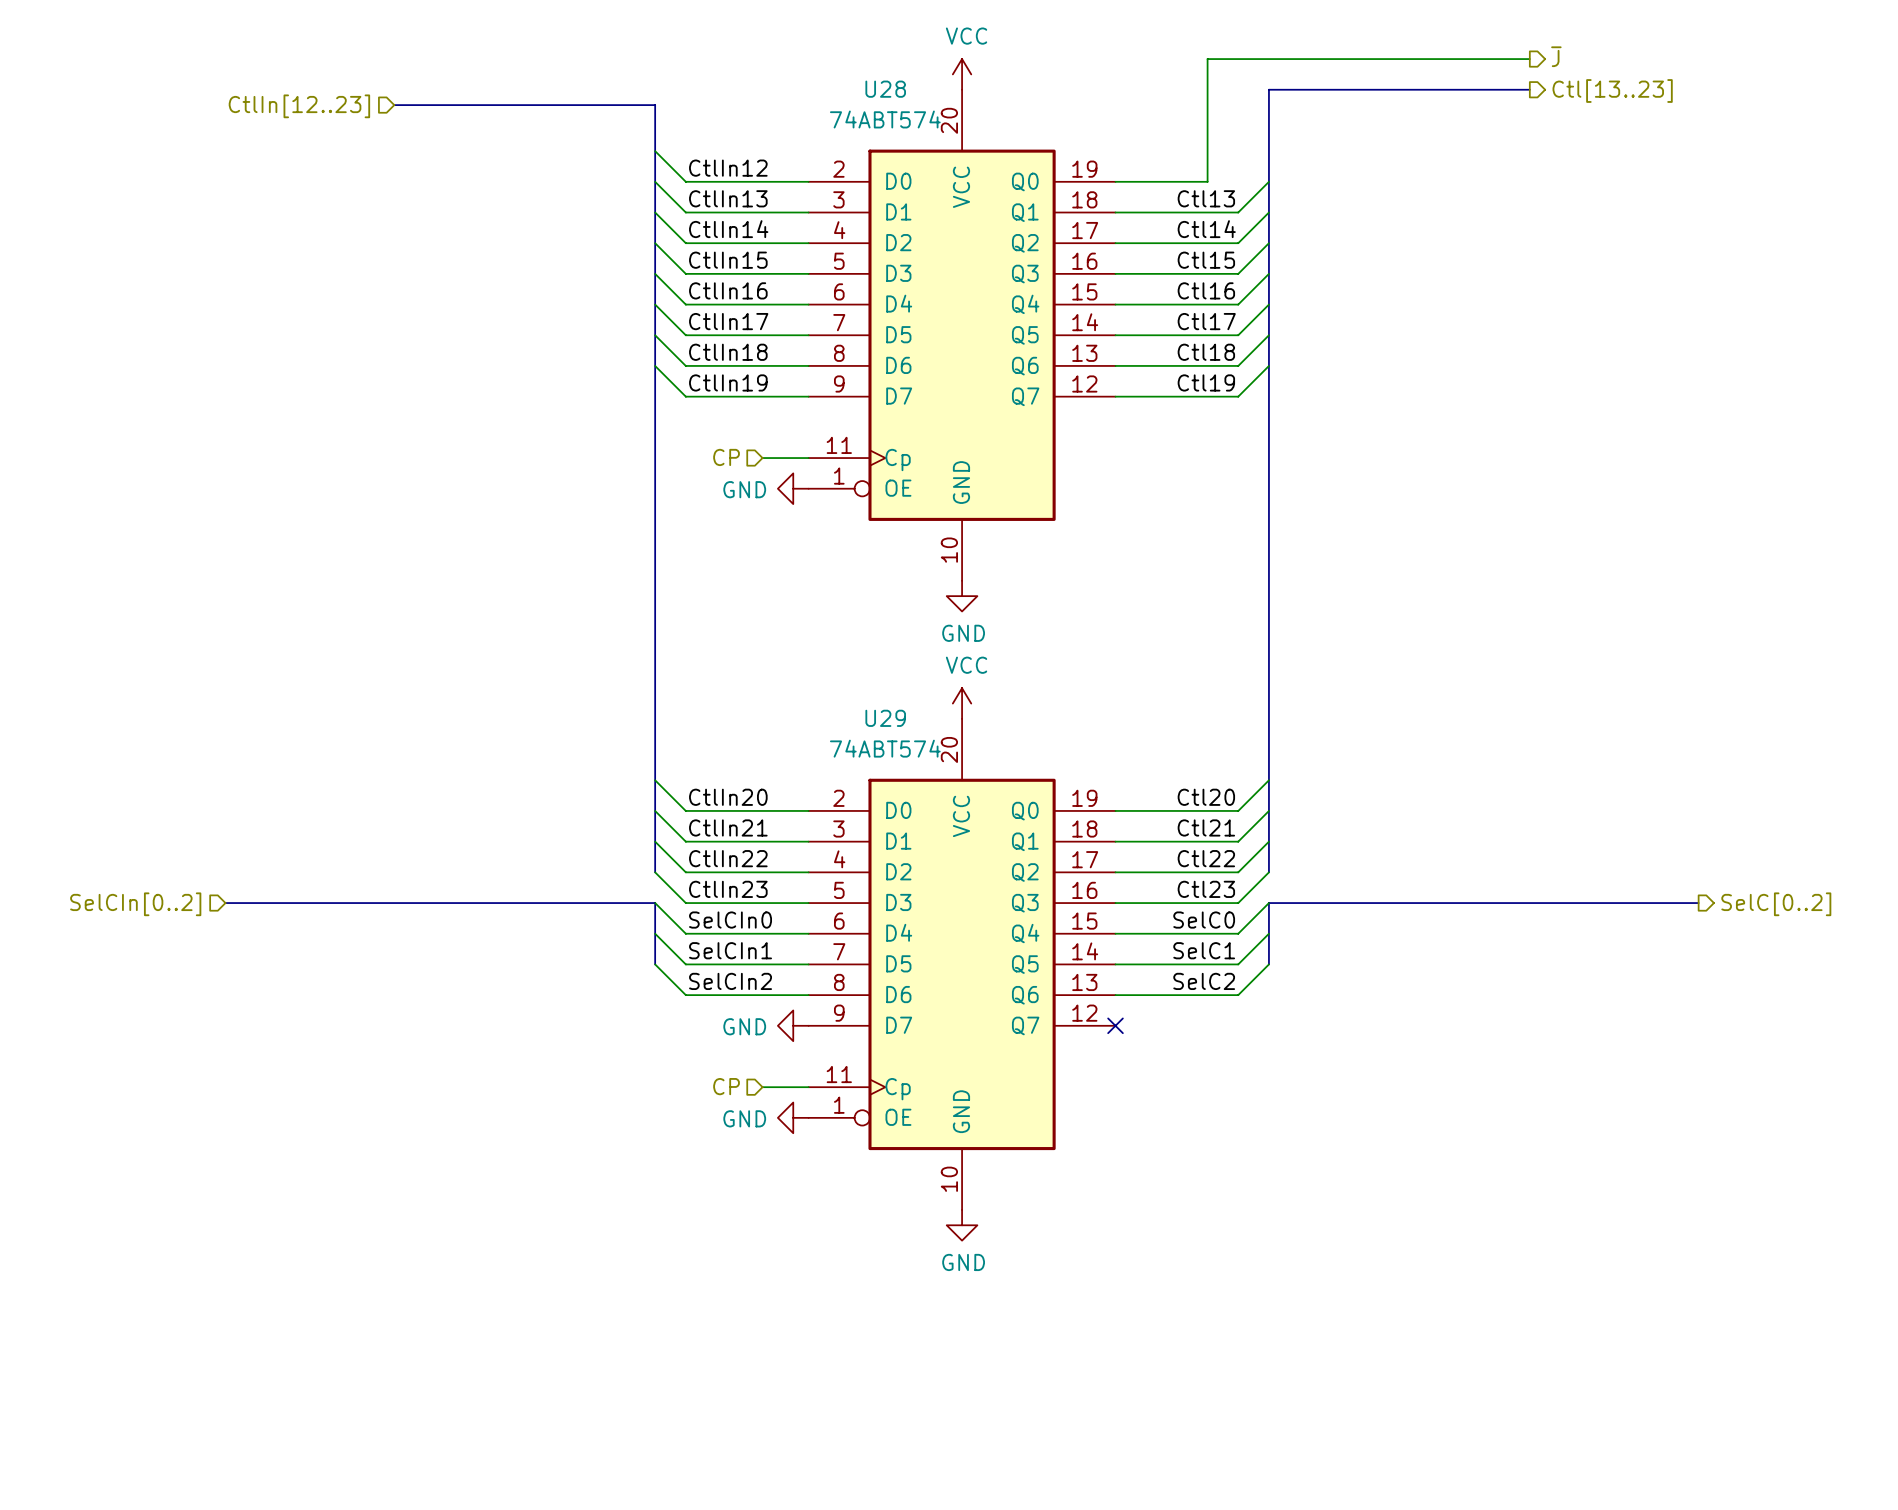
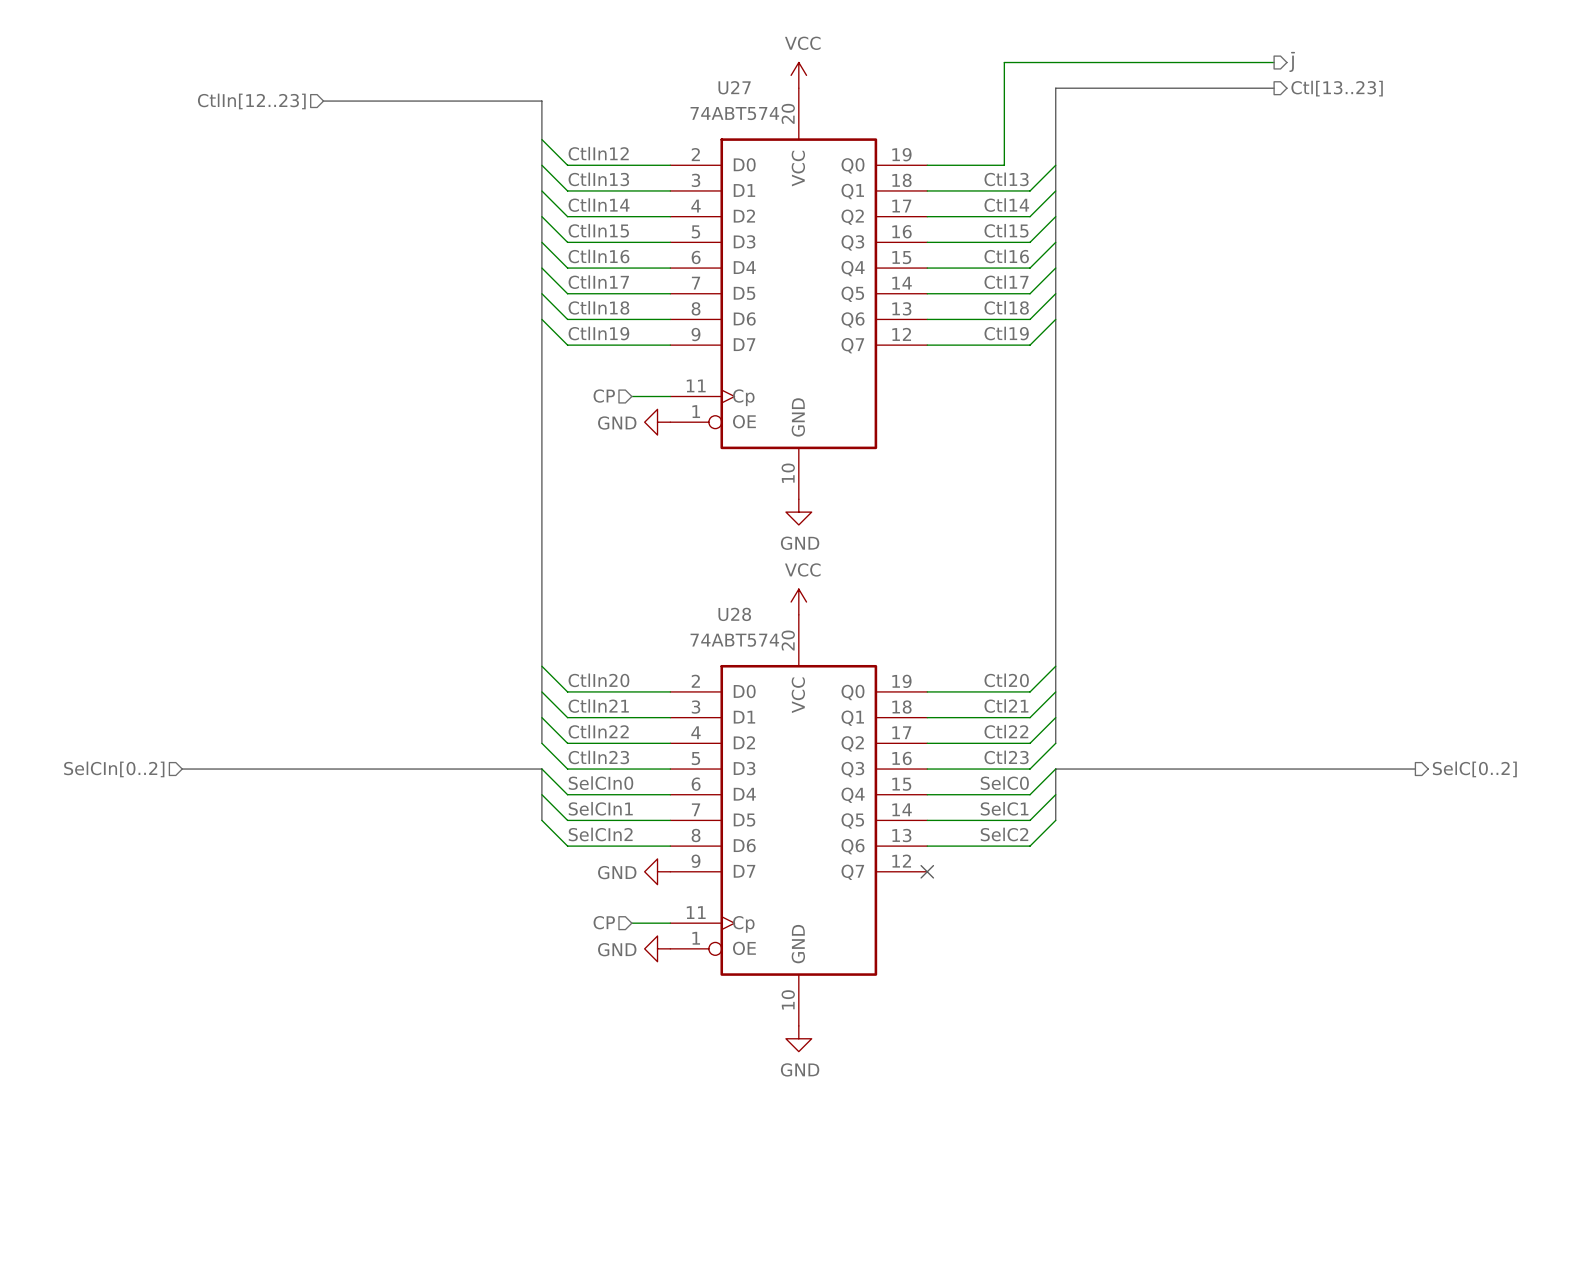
U28 name: U28 (885, 89) -> U27 (734, 87)
U29 name: U29 (885, 718) -> U28 (734, 614)

